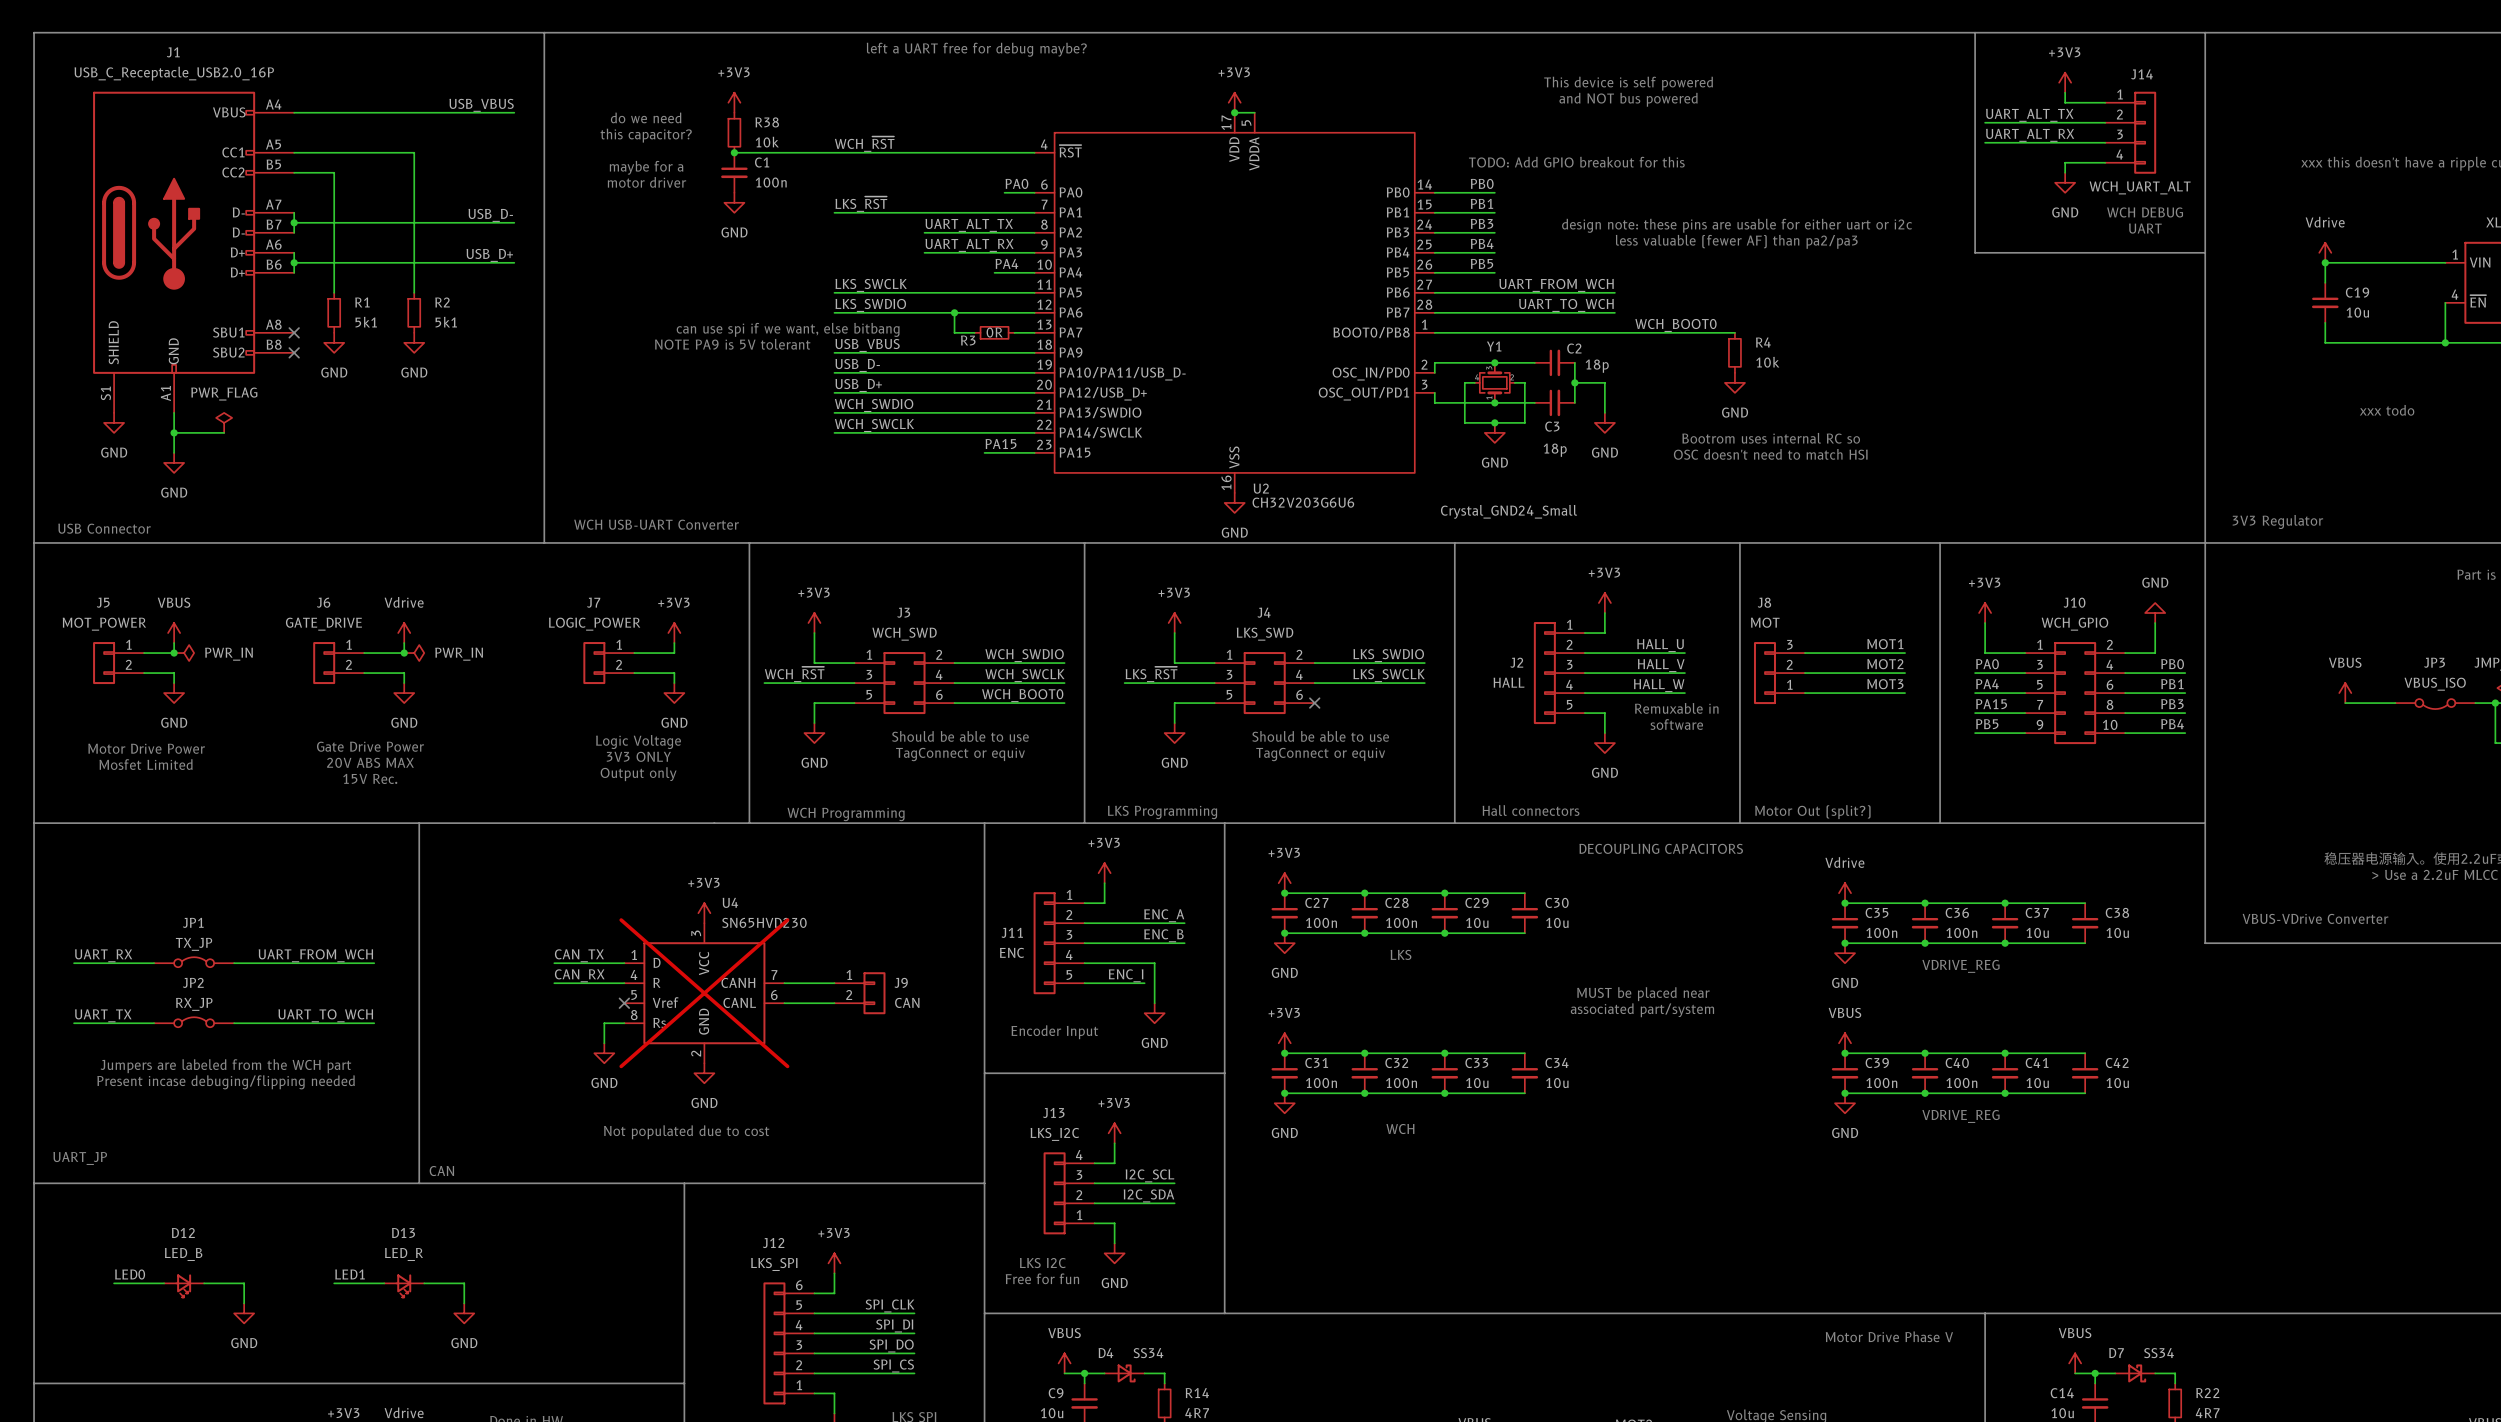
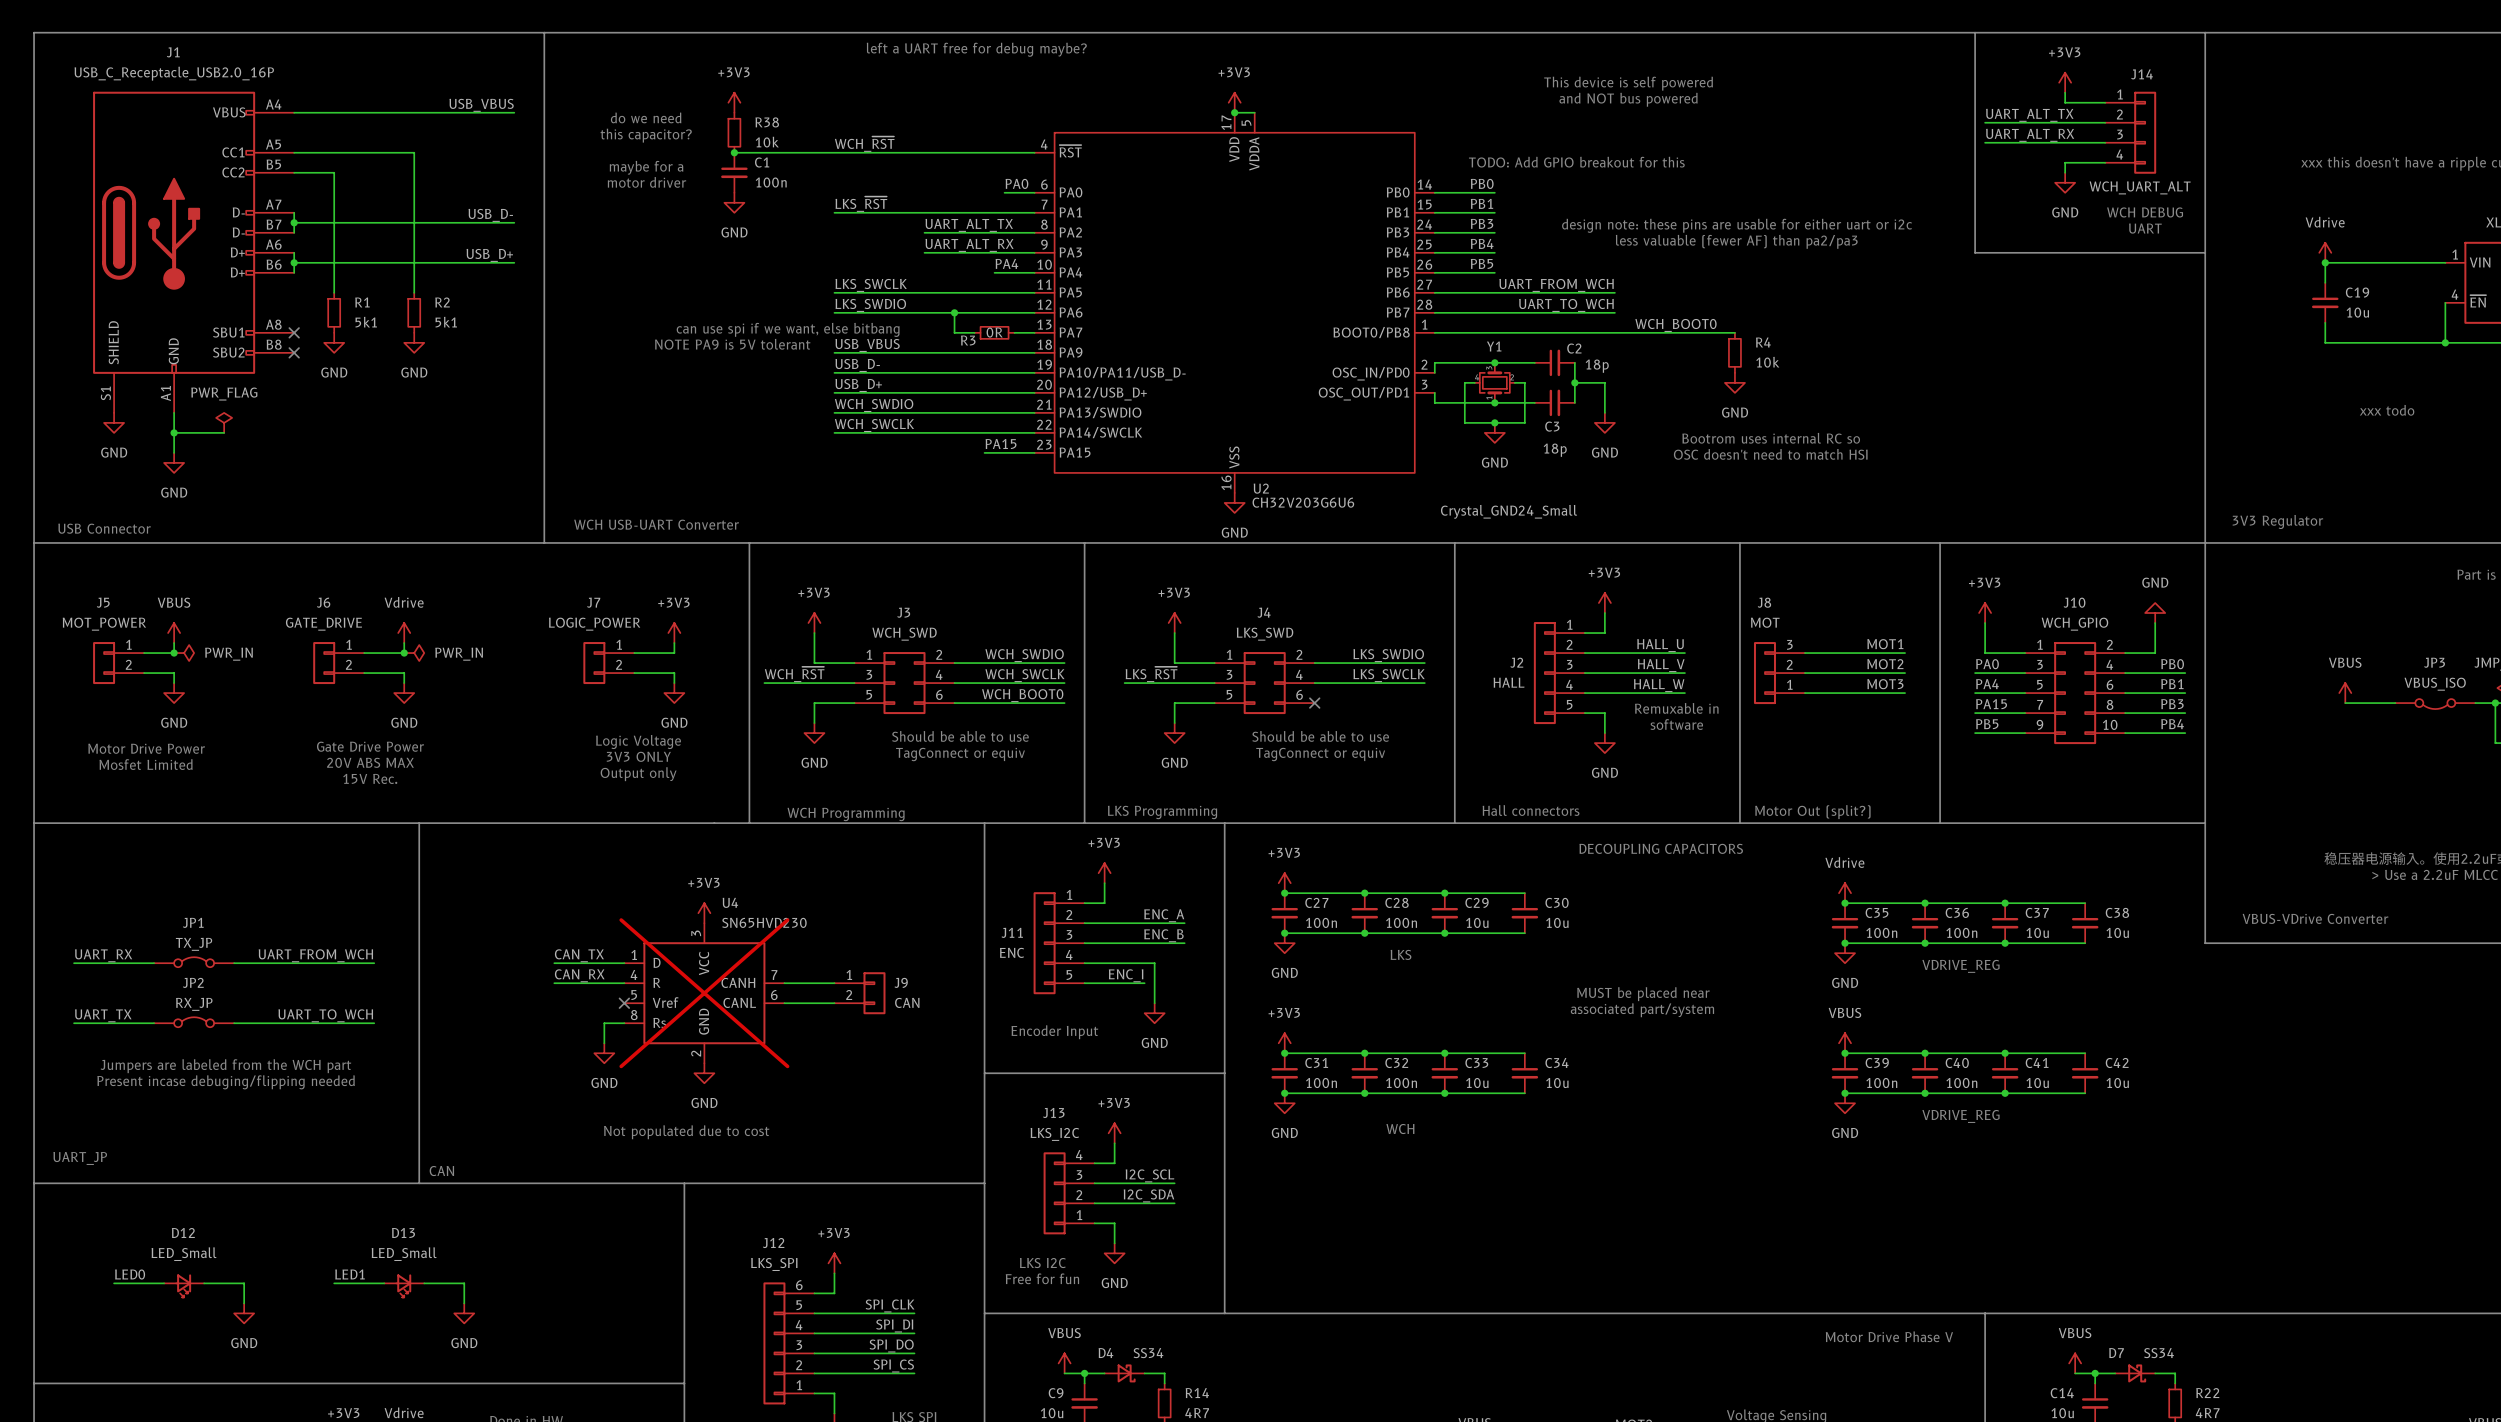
D12 value: LED_B (183, 1254) -> LED_Small (184, 1254)
D13 value: LED_R (404, 1254) -> LED_Small (404, 1254)

